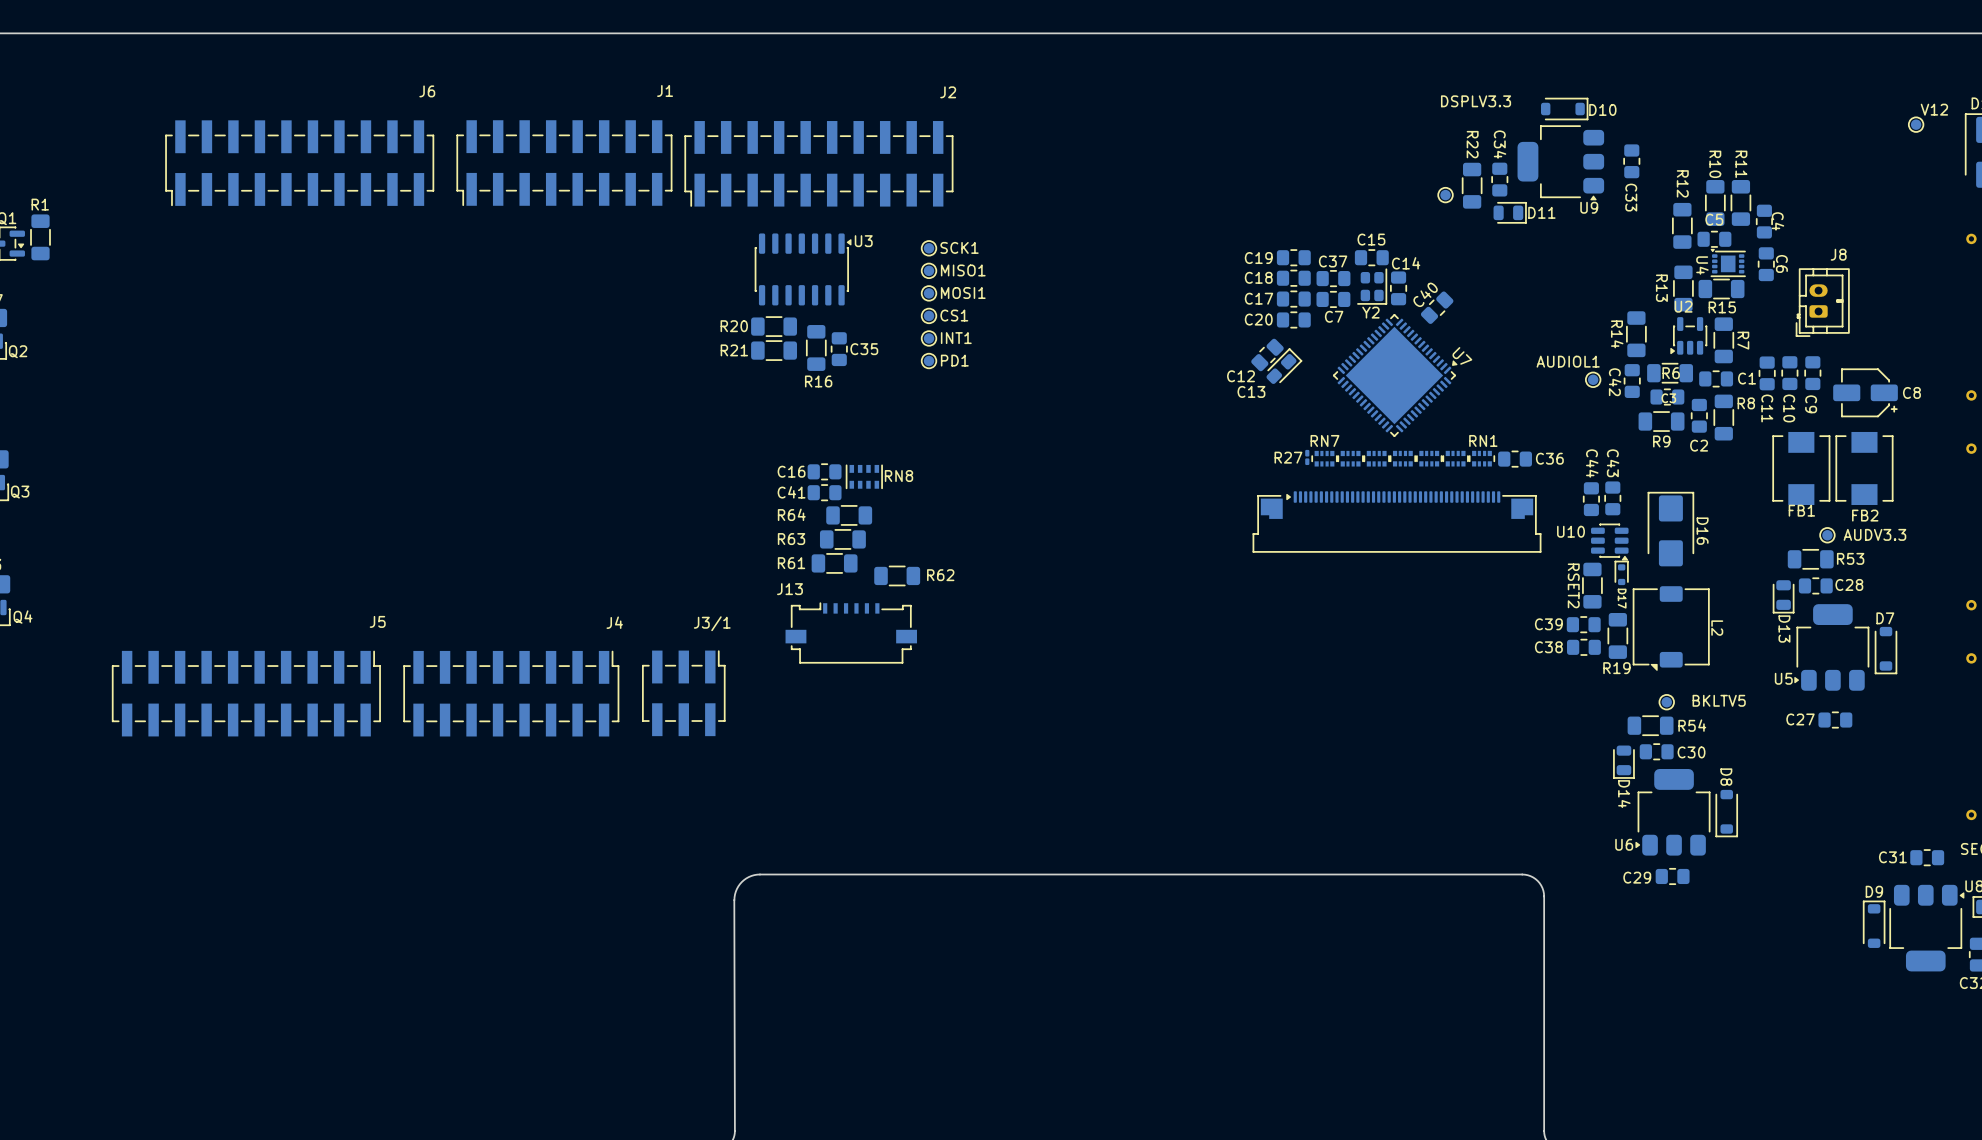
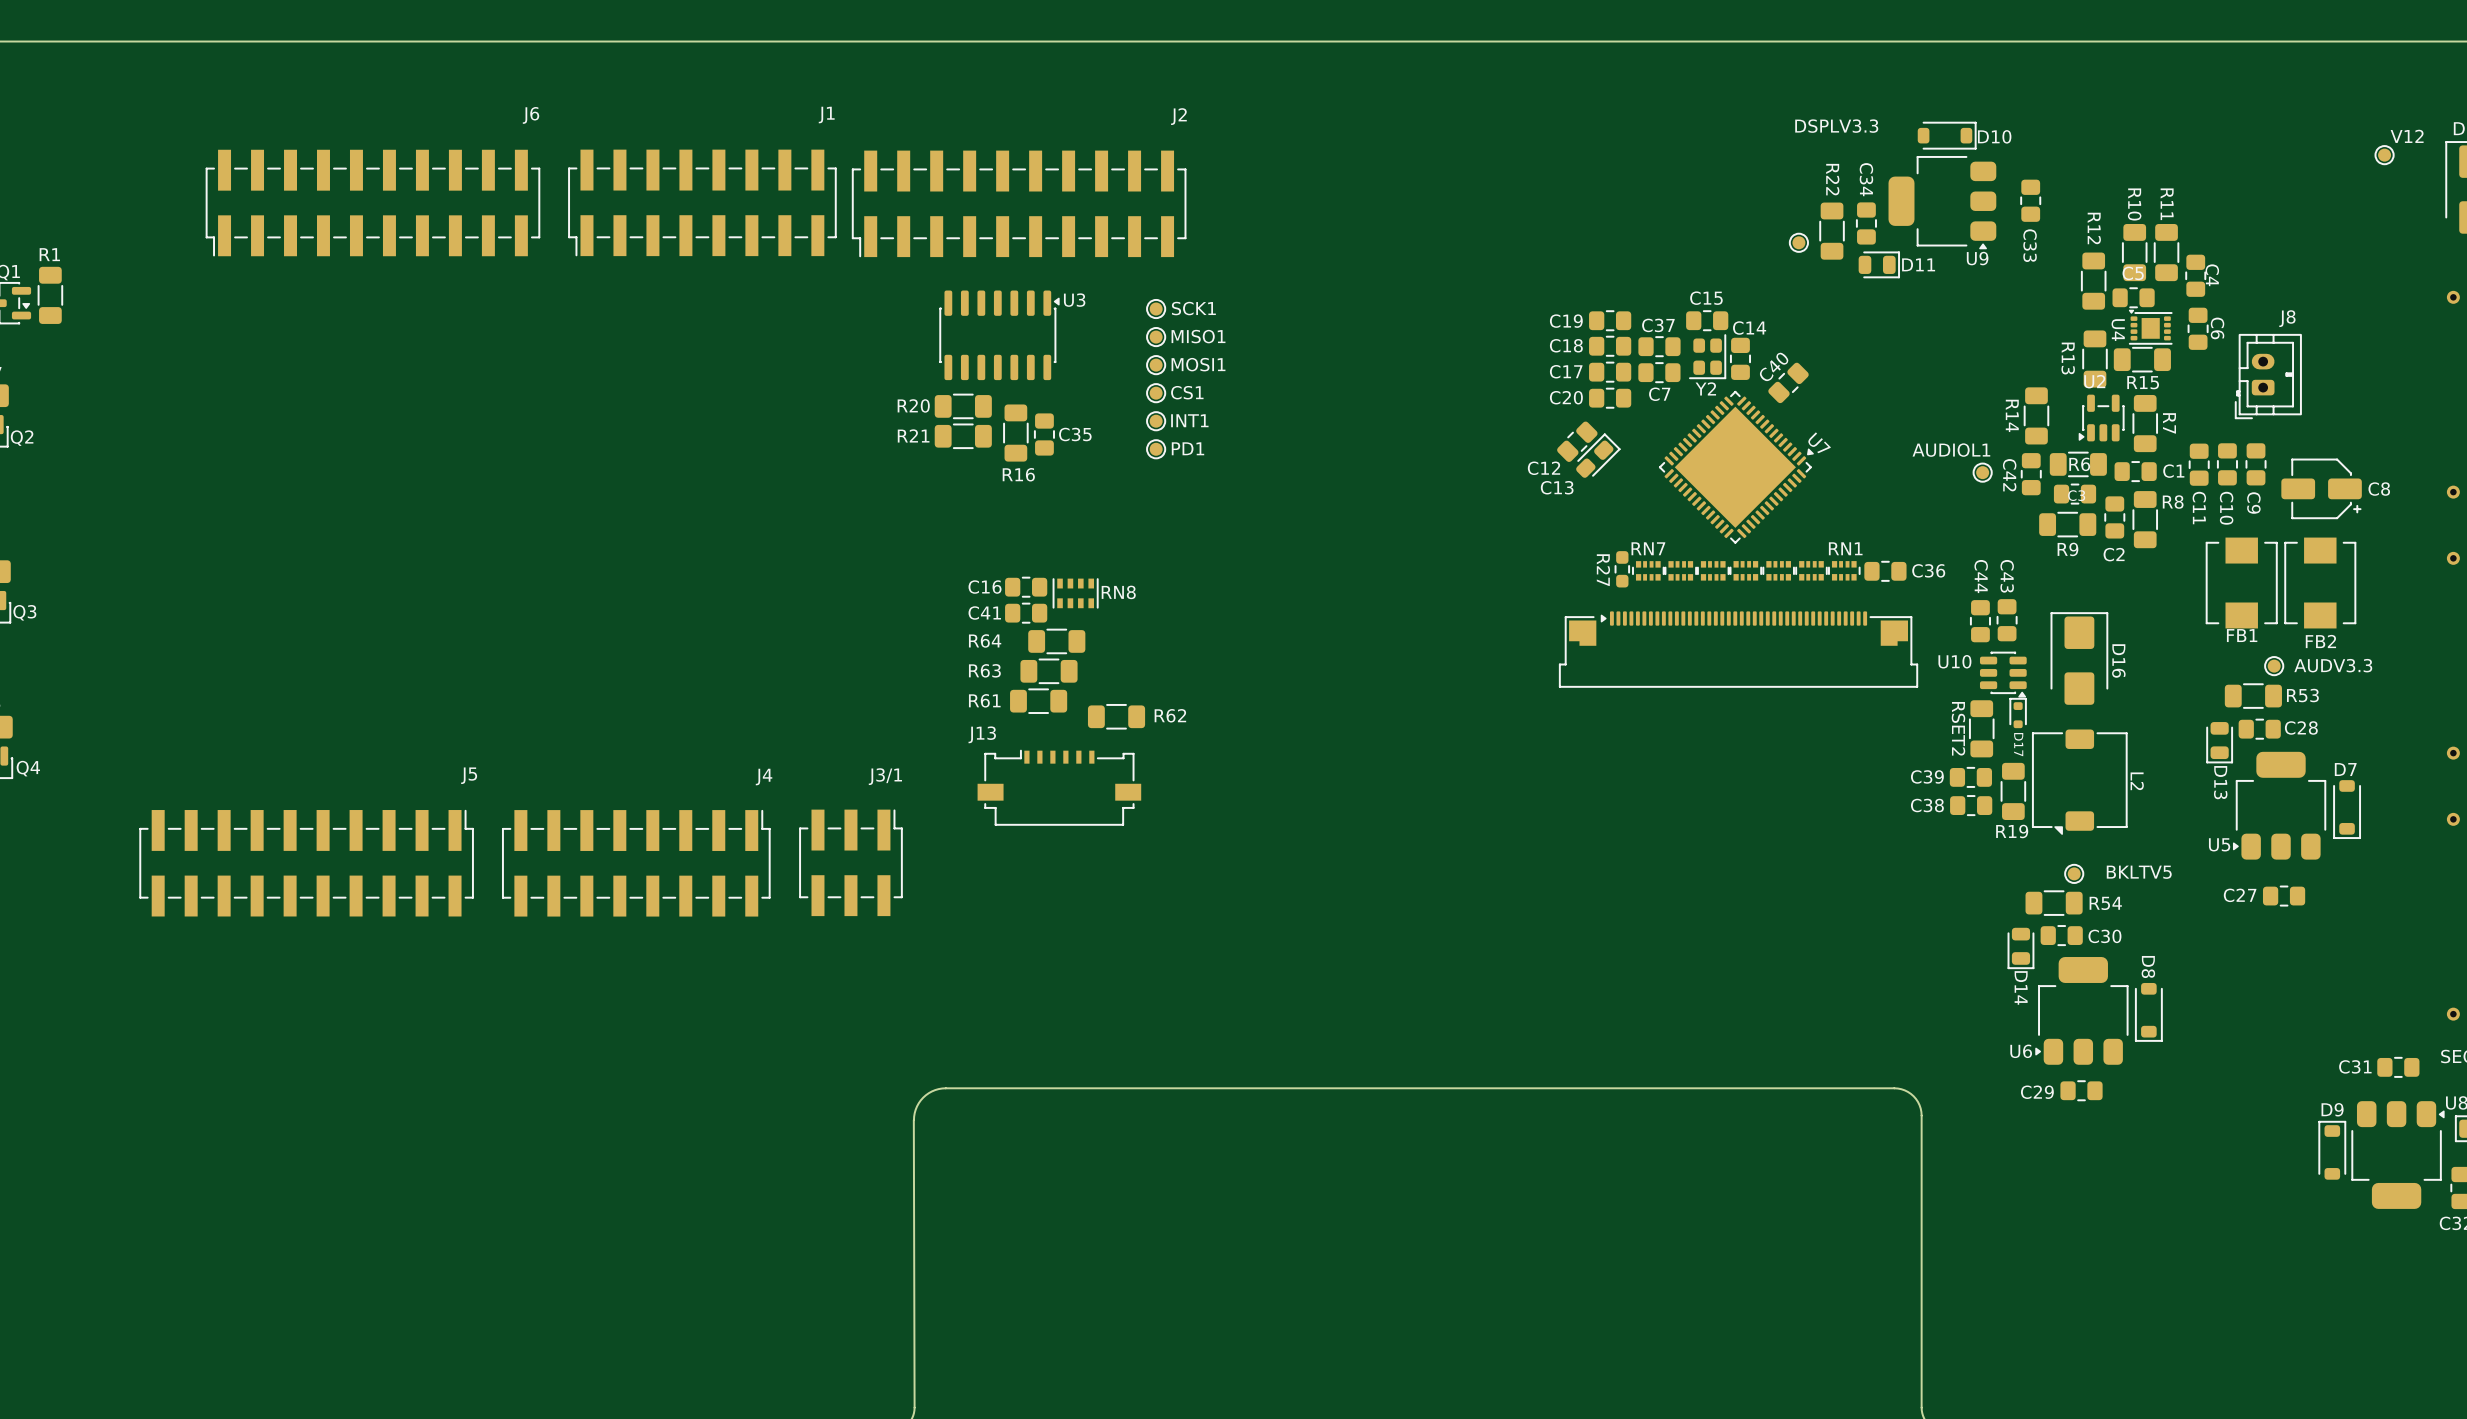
R27 footprint: [1305, 449, 1310, 466] -> [1614, 551, 1630, 588]

